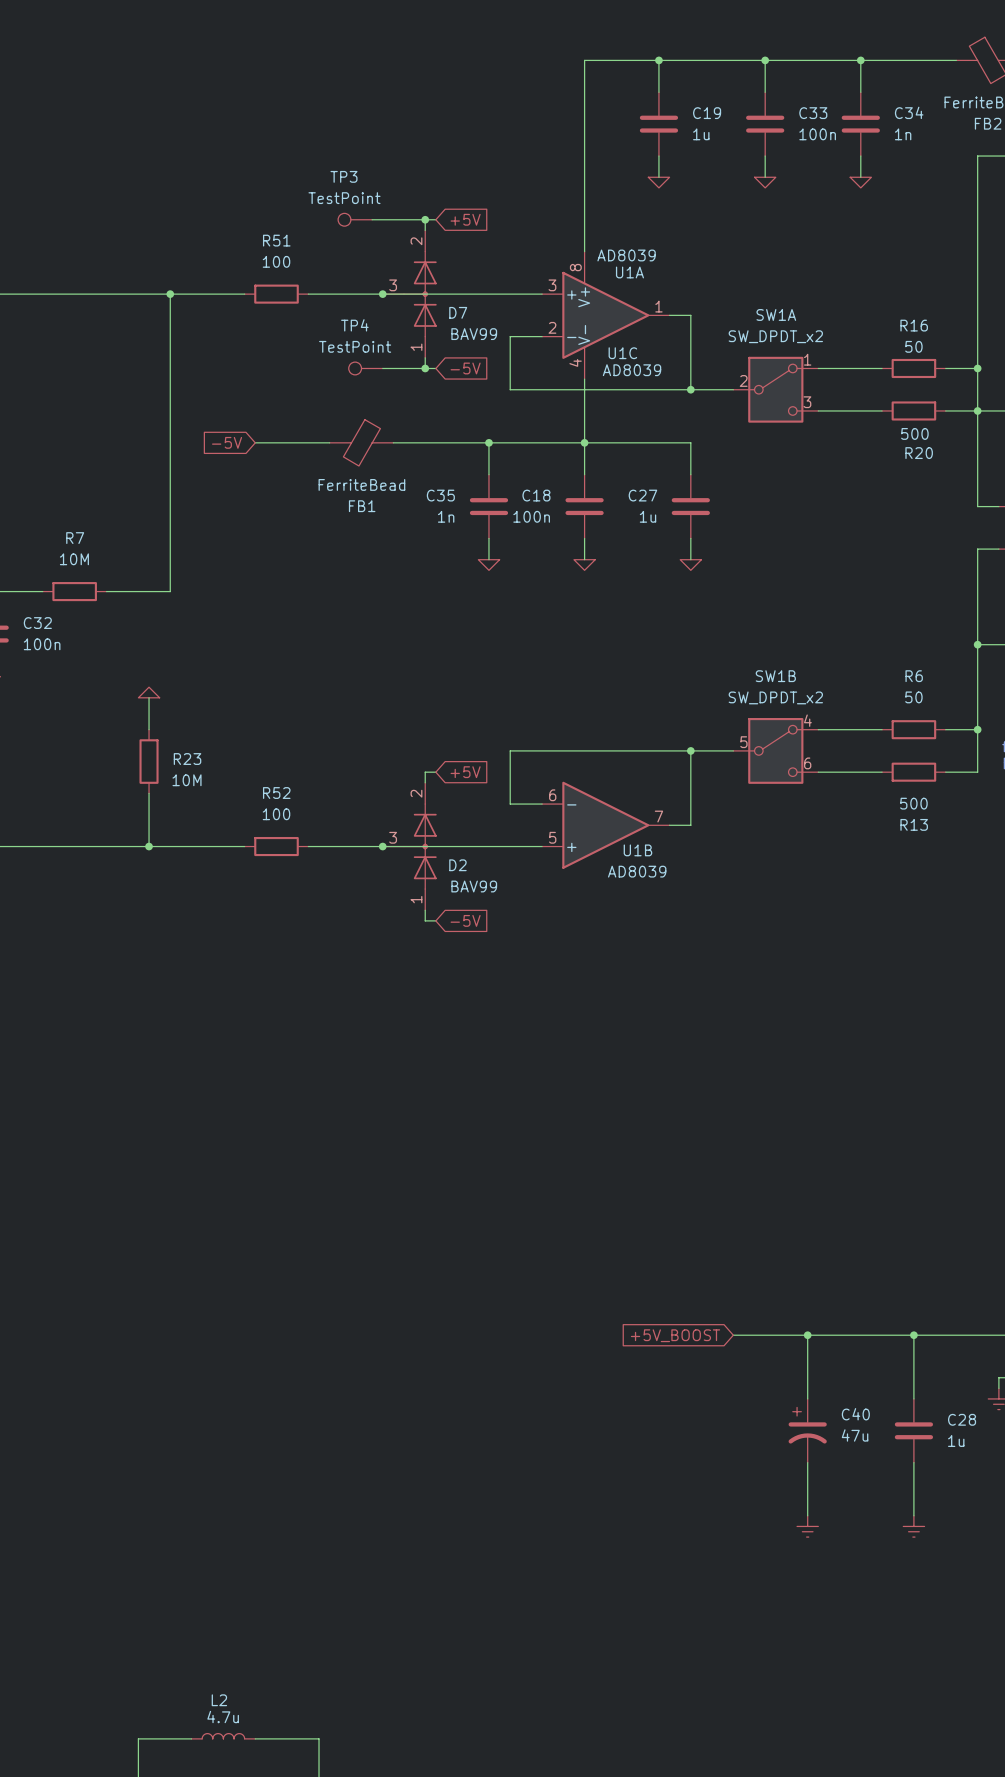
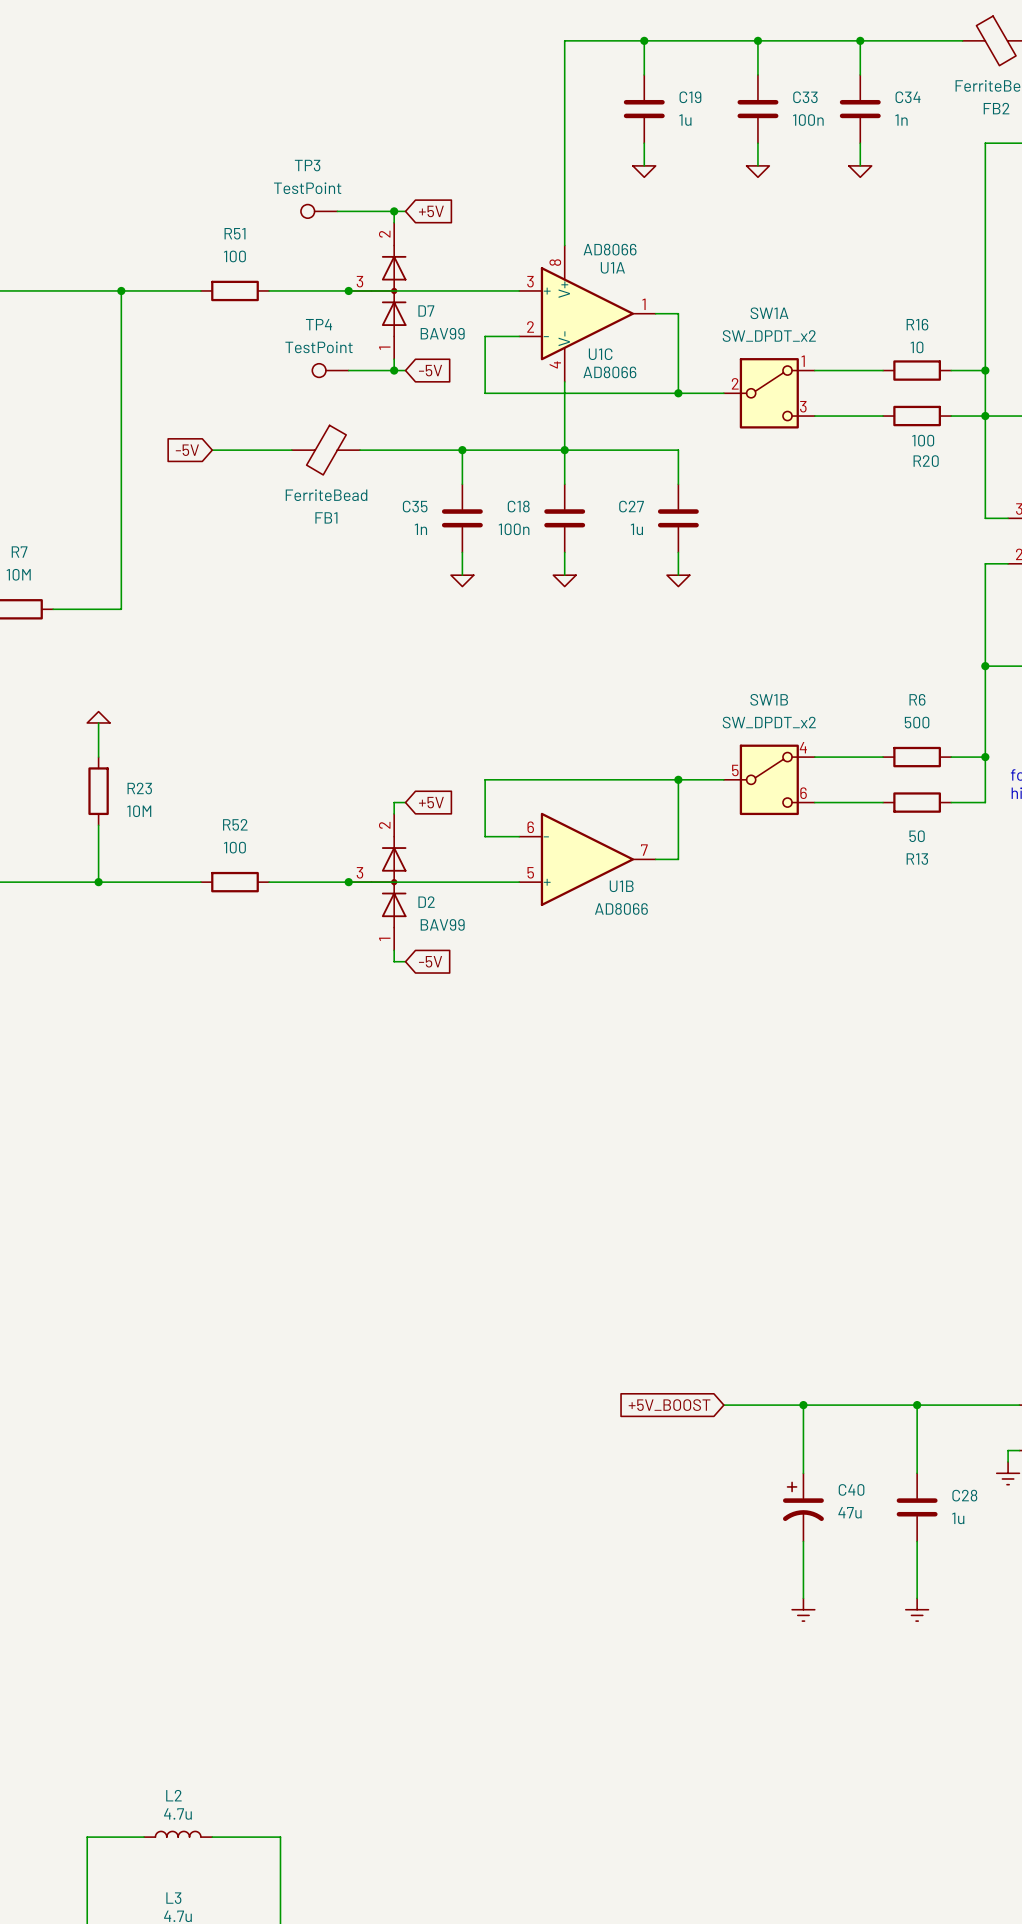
U1A value: AD8039 (626, 255) -> AD8066 (610, 249)
R16 value: 50 (913, 346) -> 10 (917, 347)
U1C value: AD8039 (632, 370) -> AD8066 (609, 372)
R20 value: 500 (914, 433) -> 100 (923, 440)
R6 value: 50 (913, 697) -> 500 (917, 722)
R13 value: 500 (913, 803) -> 50 (917, 836)
U1B value: AD8039 (637, 871) -> AD8066 (621, 908)

